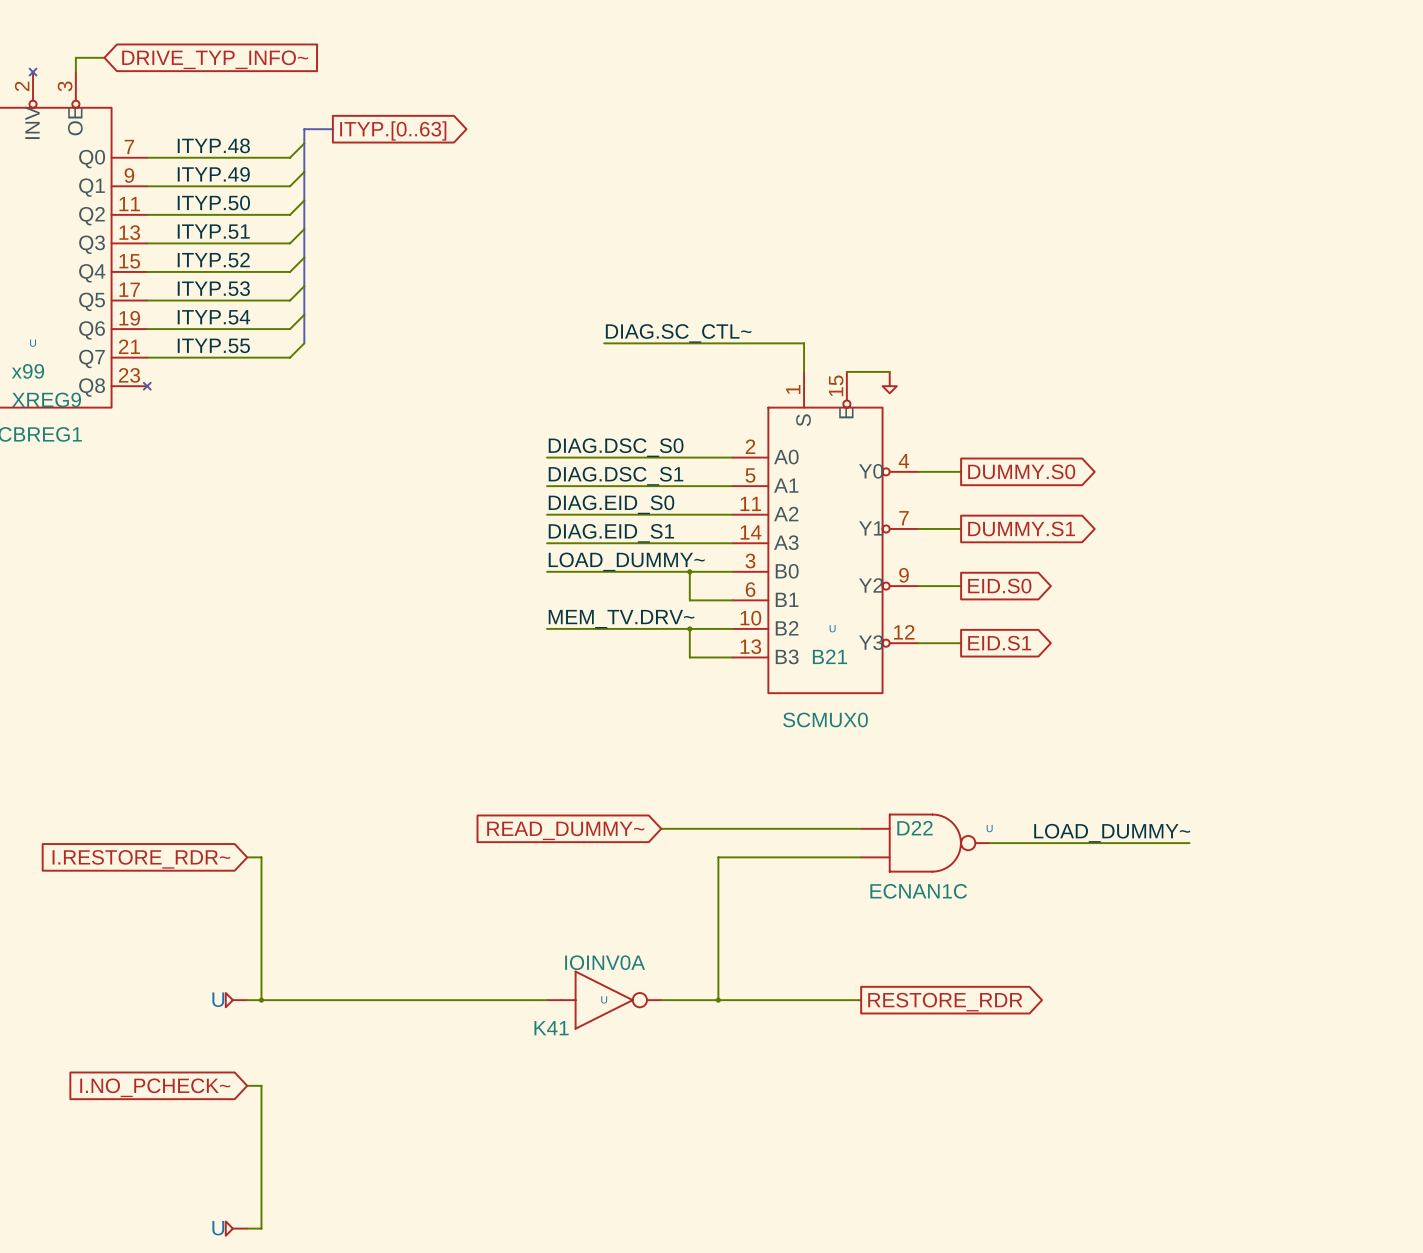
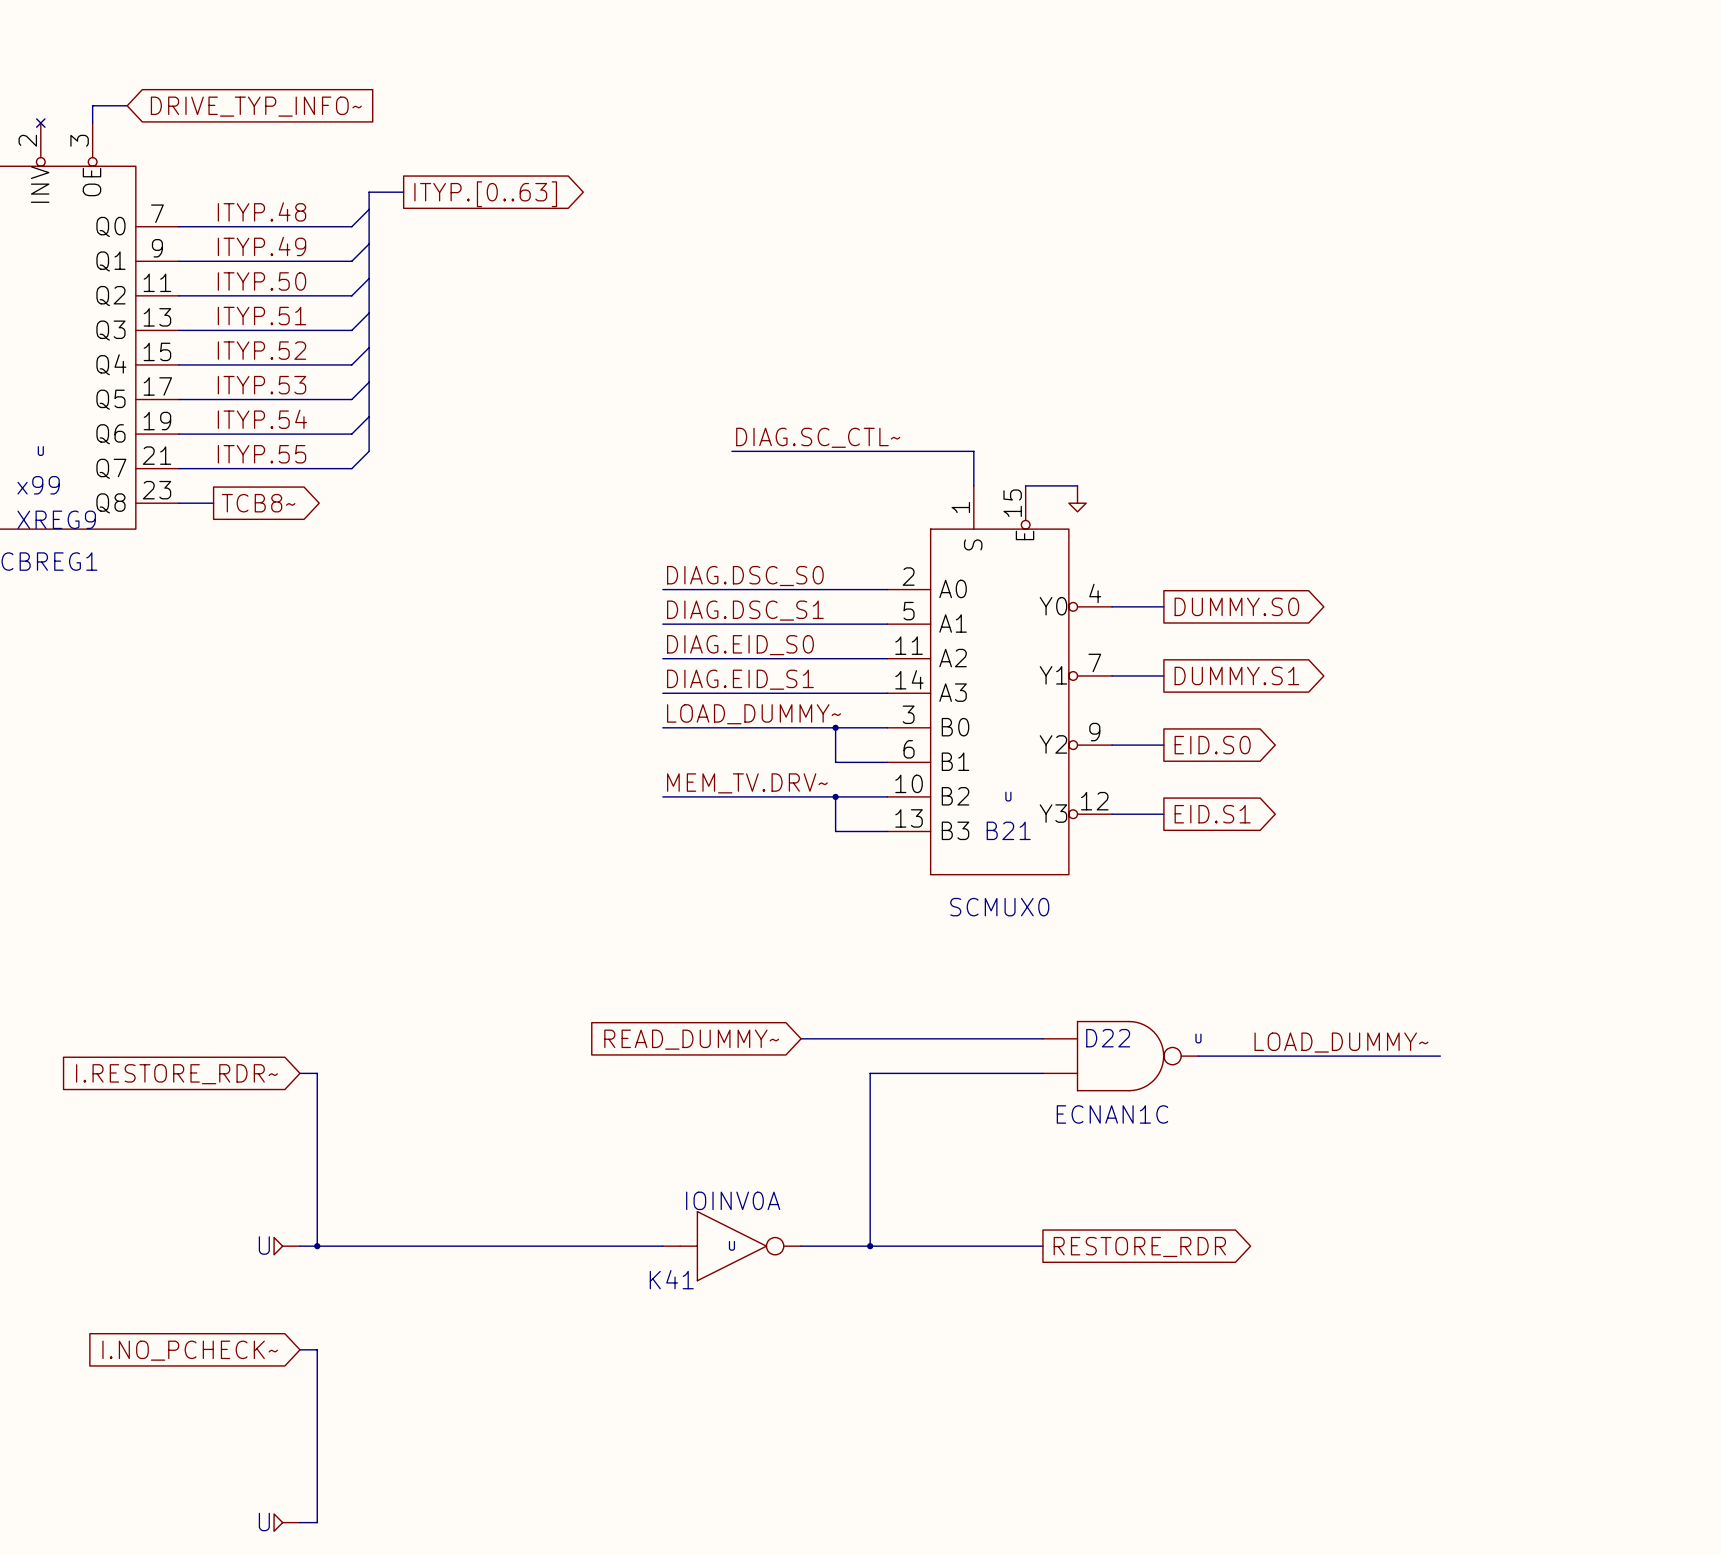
wire: none -> (179, 503) (213, 503)
no-connect mark: (147, 386) -> none
global label: none -> TCB8~ (258, 503)

